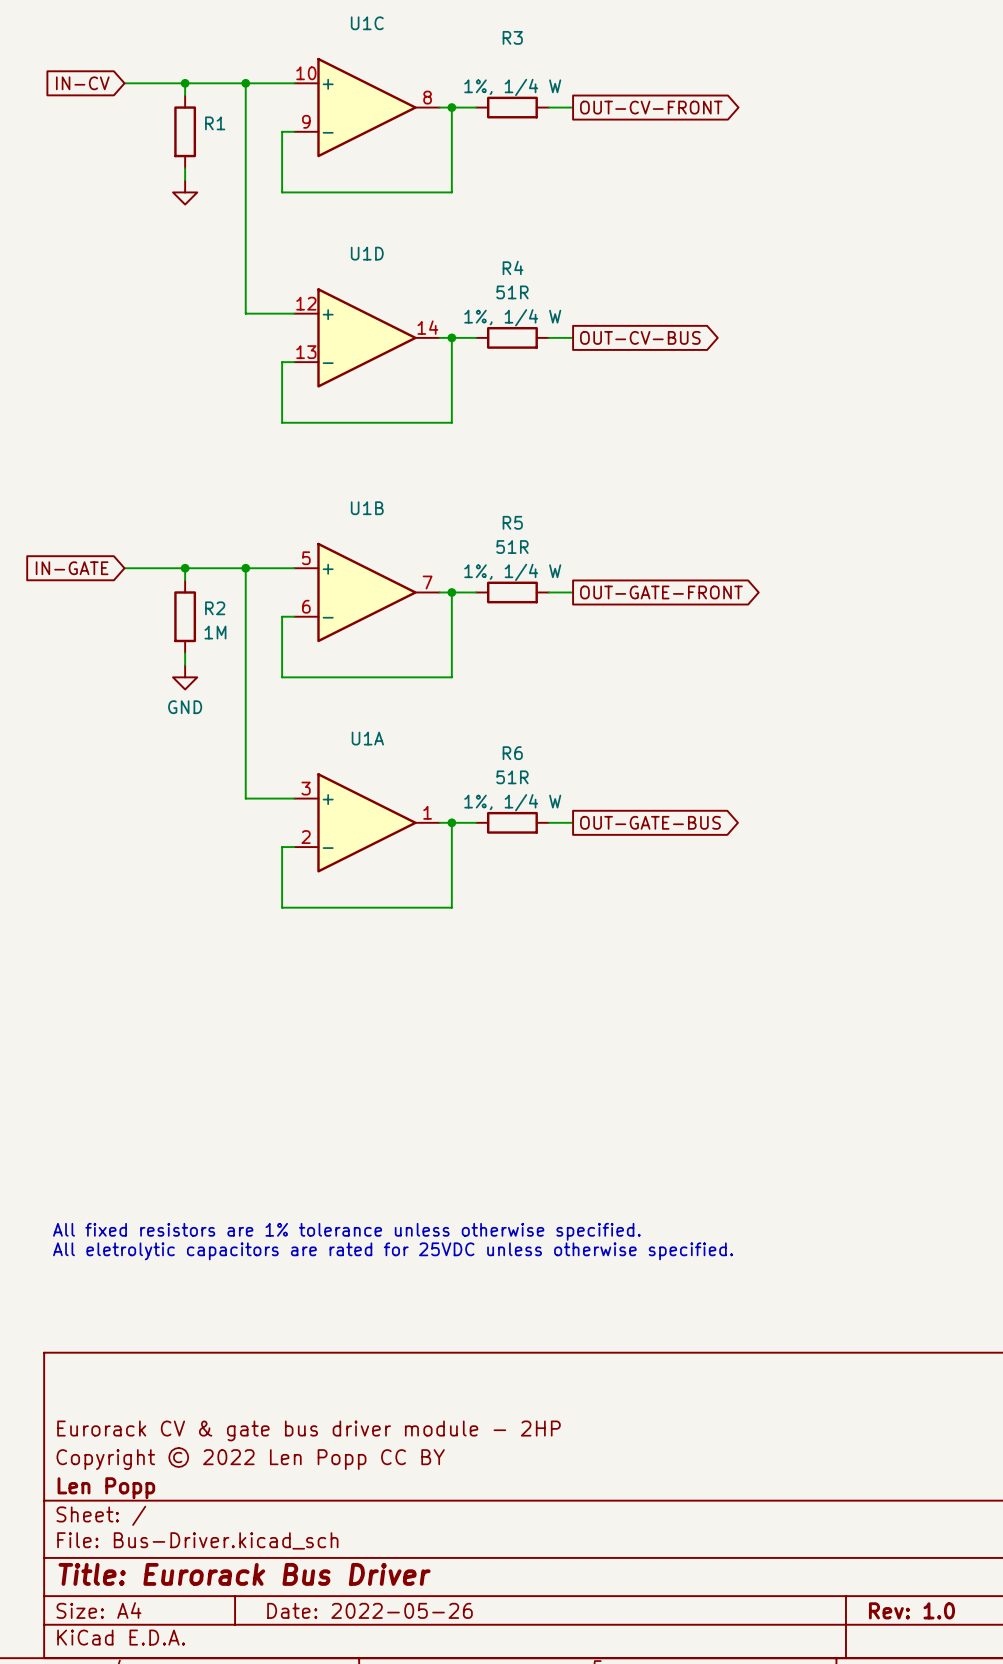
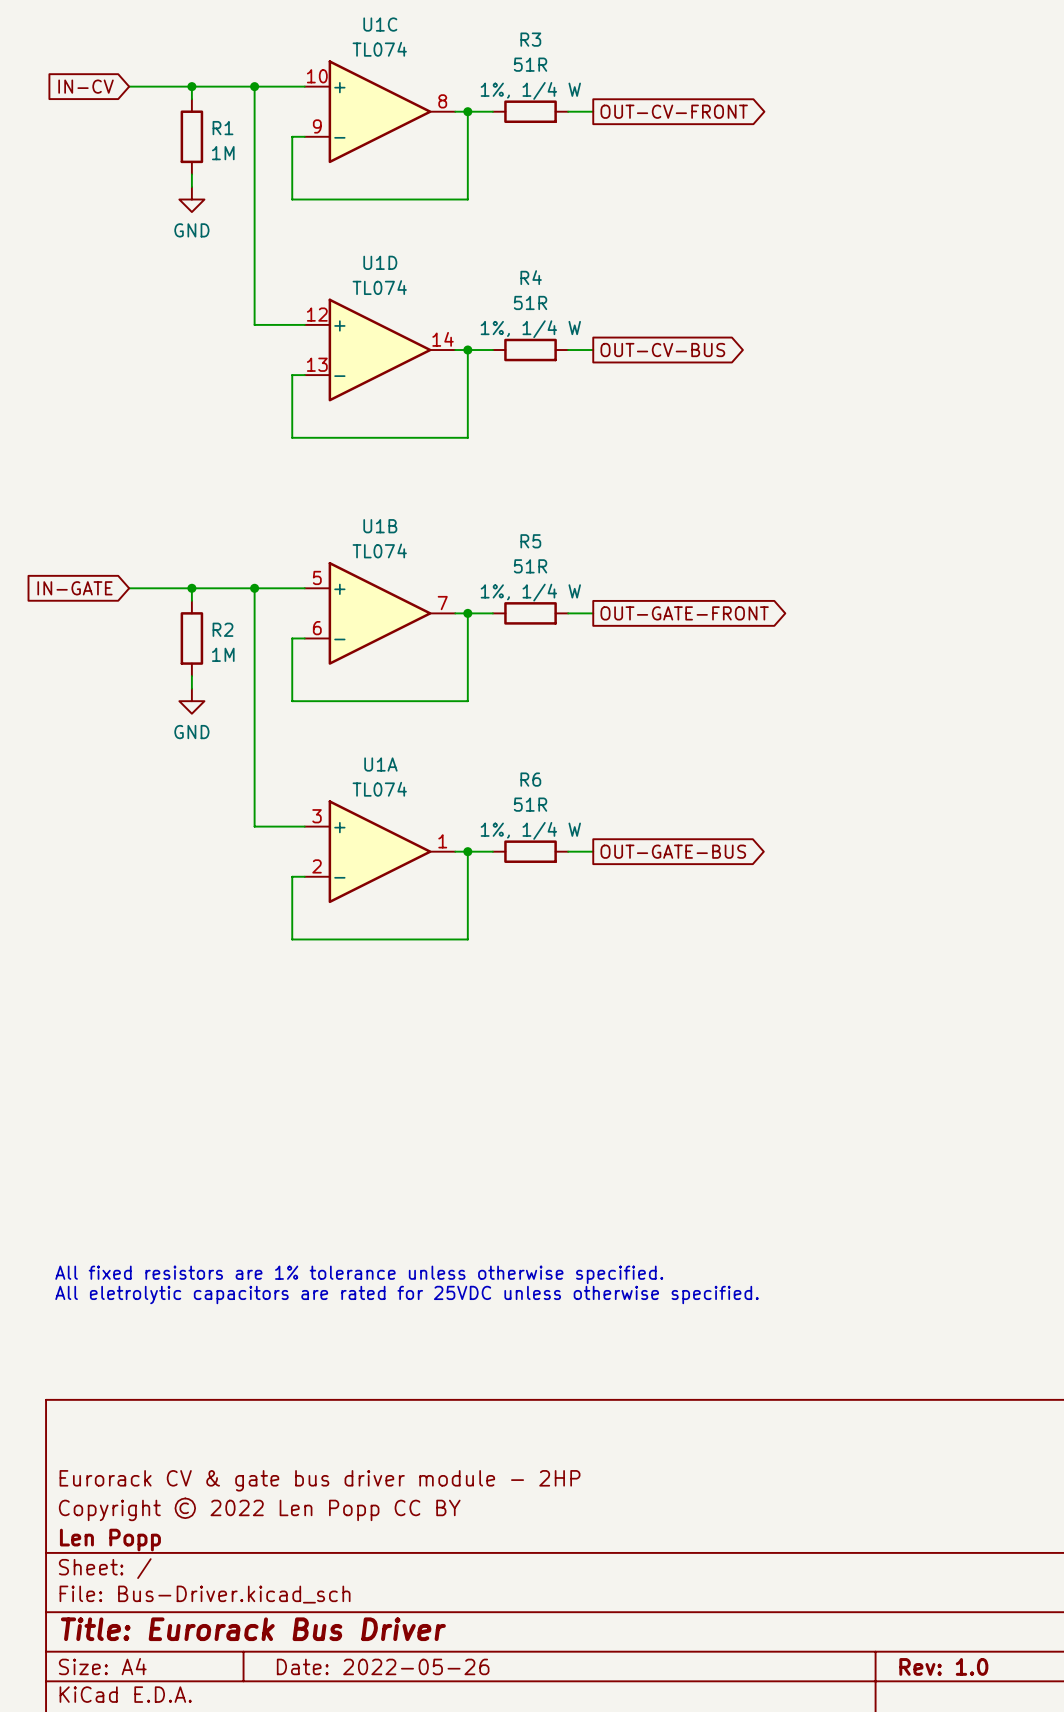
U1C value: none -> TL074 (379, 49)
R3 value: none -> 51R (530, 64)
R1 value: none -> 1M (223, 153)
power symbol text: none -> GND (191, 230)
U1D value: none -> TL074 (379, 287)
U1B value: none -> TL074 (379, 550)
U1A value: none -> TL074 (379, 789)

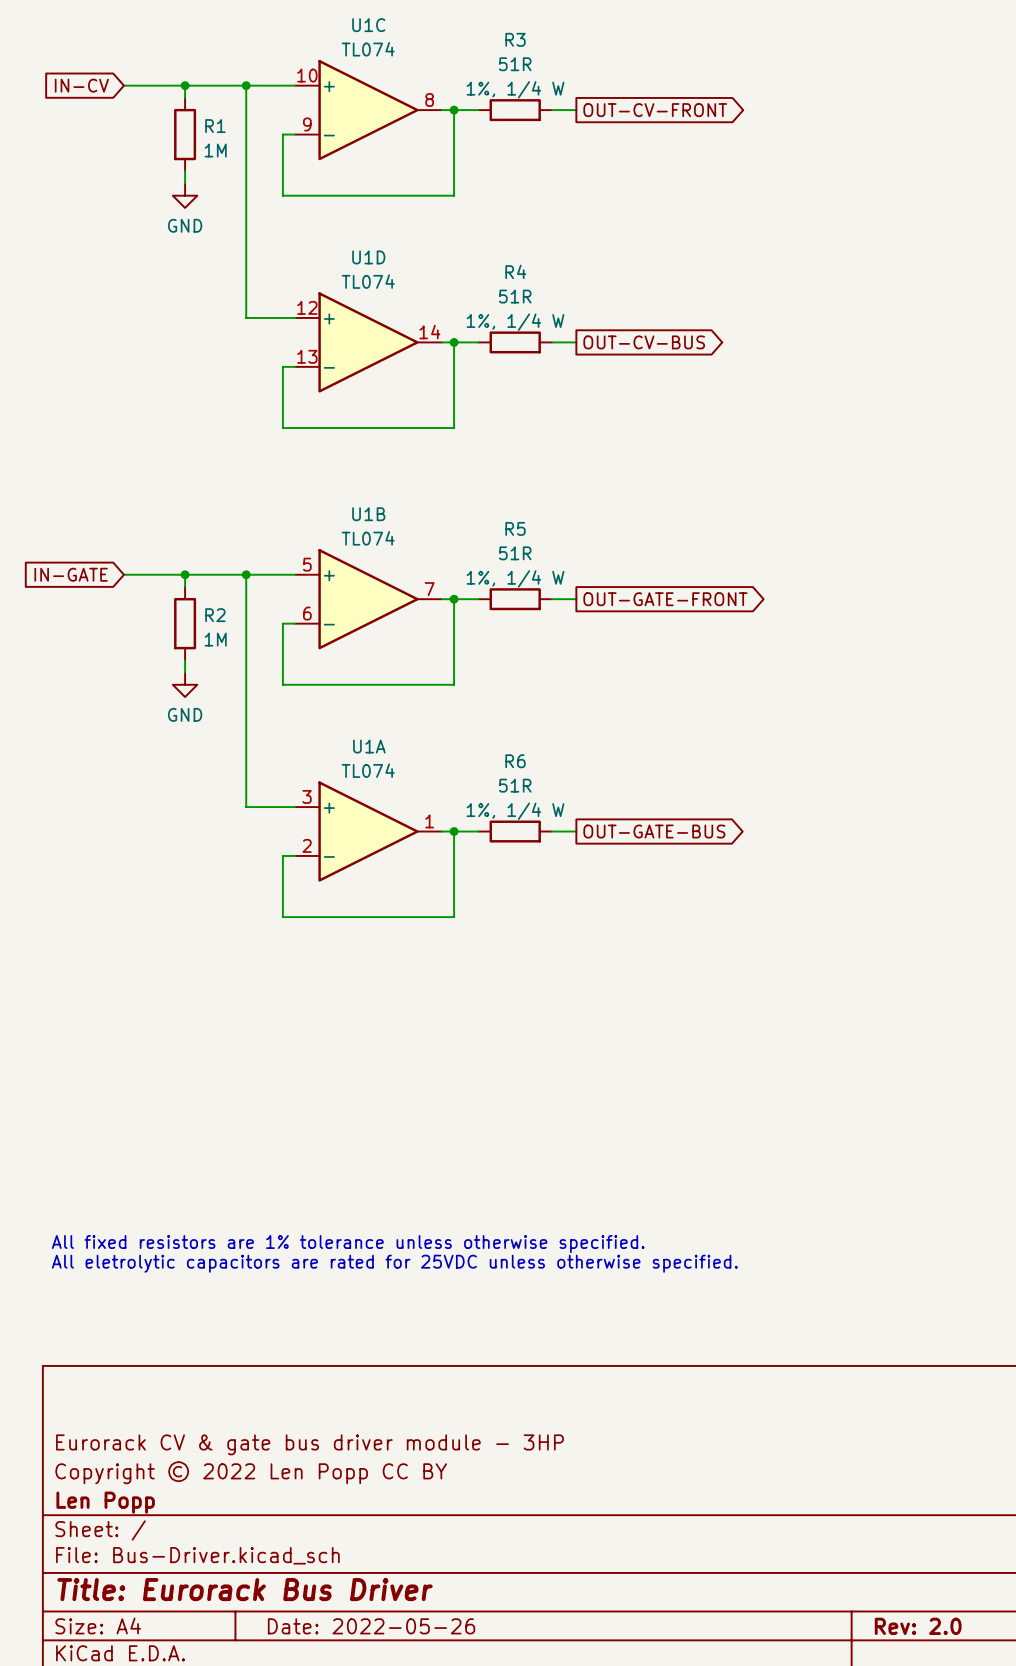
title block: Eurorack CV & gate bus driver module - 2HP (320, 1480) -> Eurorack CV & gate bus driver module - 3HP (309, 1444)
title block: Rev: 1.0 (943, 1666) -> Rev: 2.0 (918, 1626)

